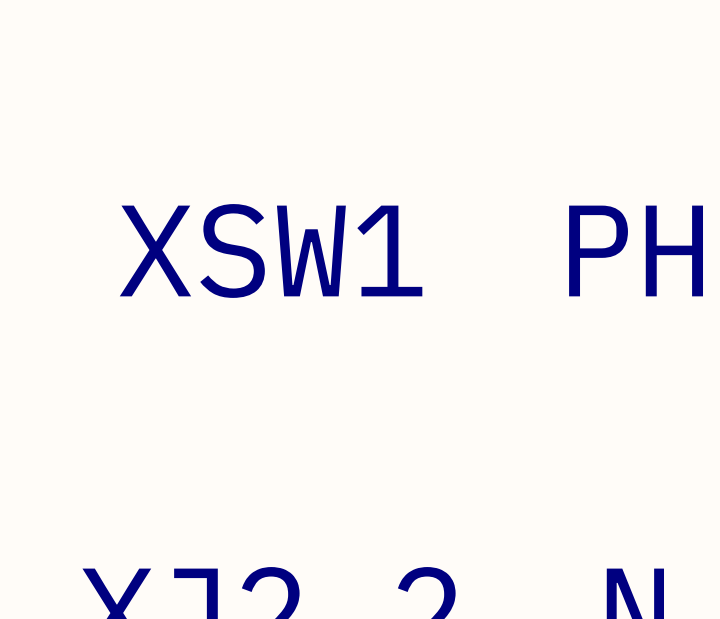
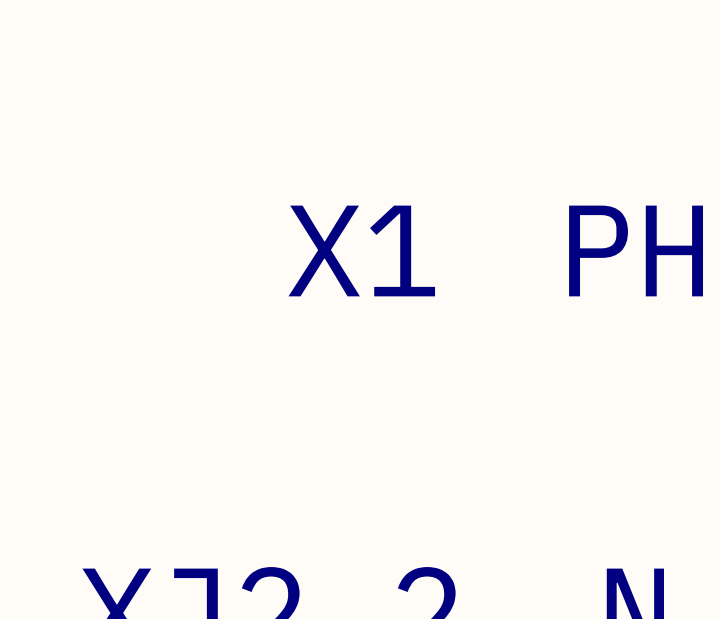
XSW1 name: XSW1 (271, 250) -> X1 (361, 250)

